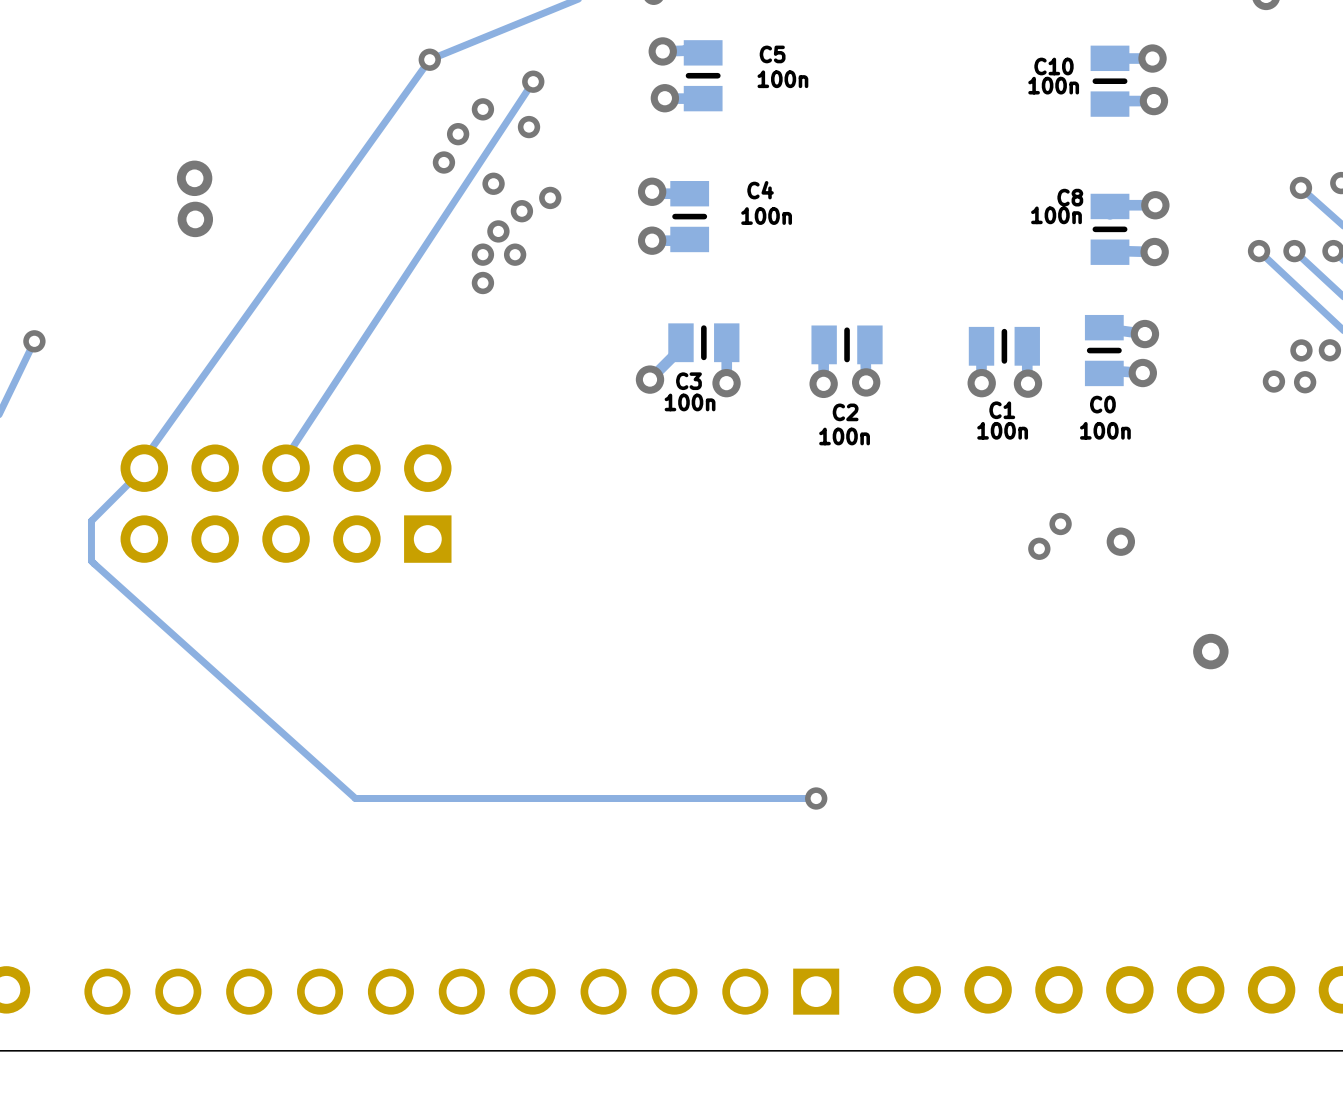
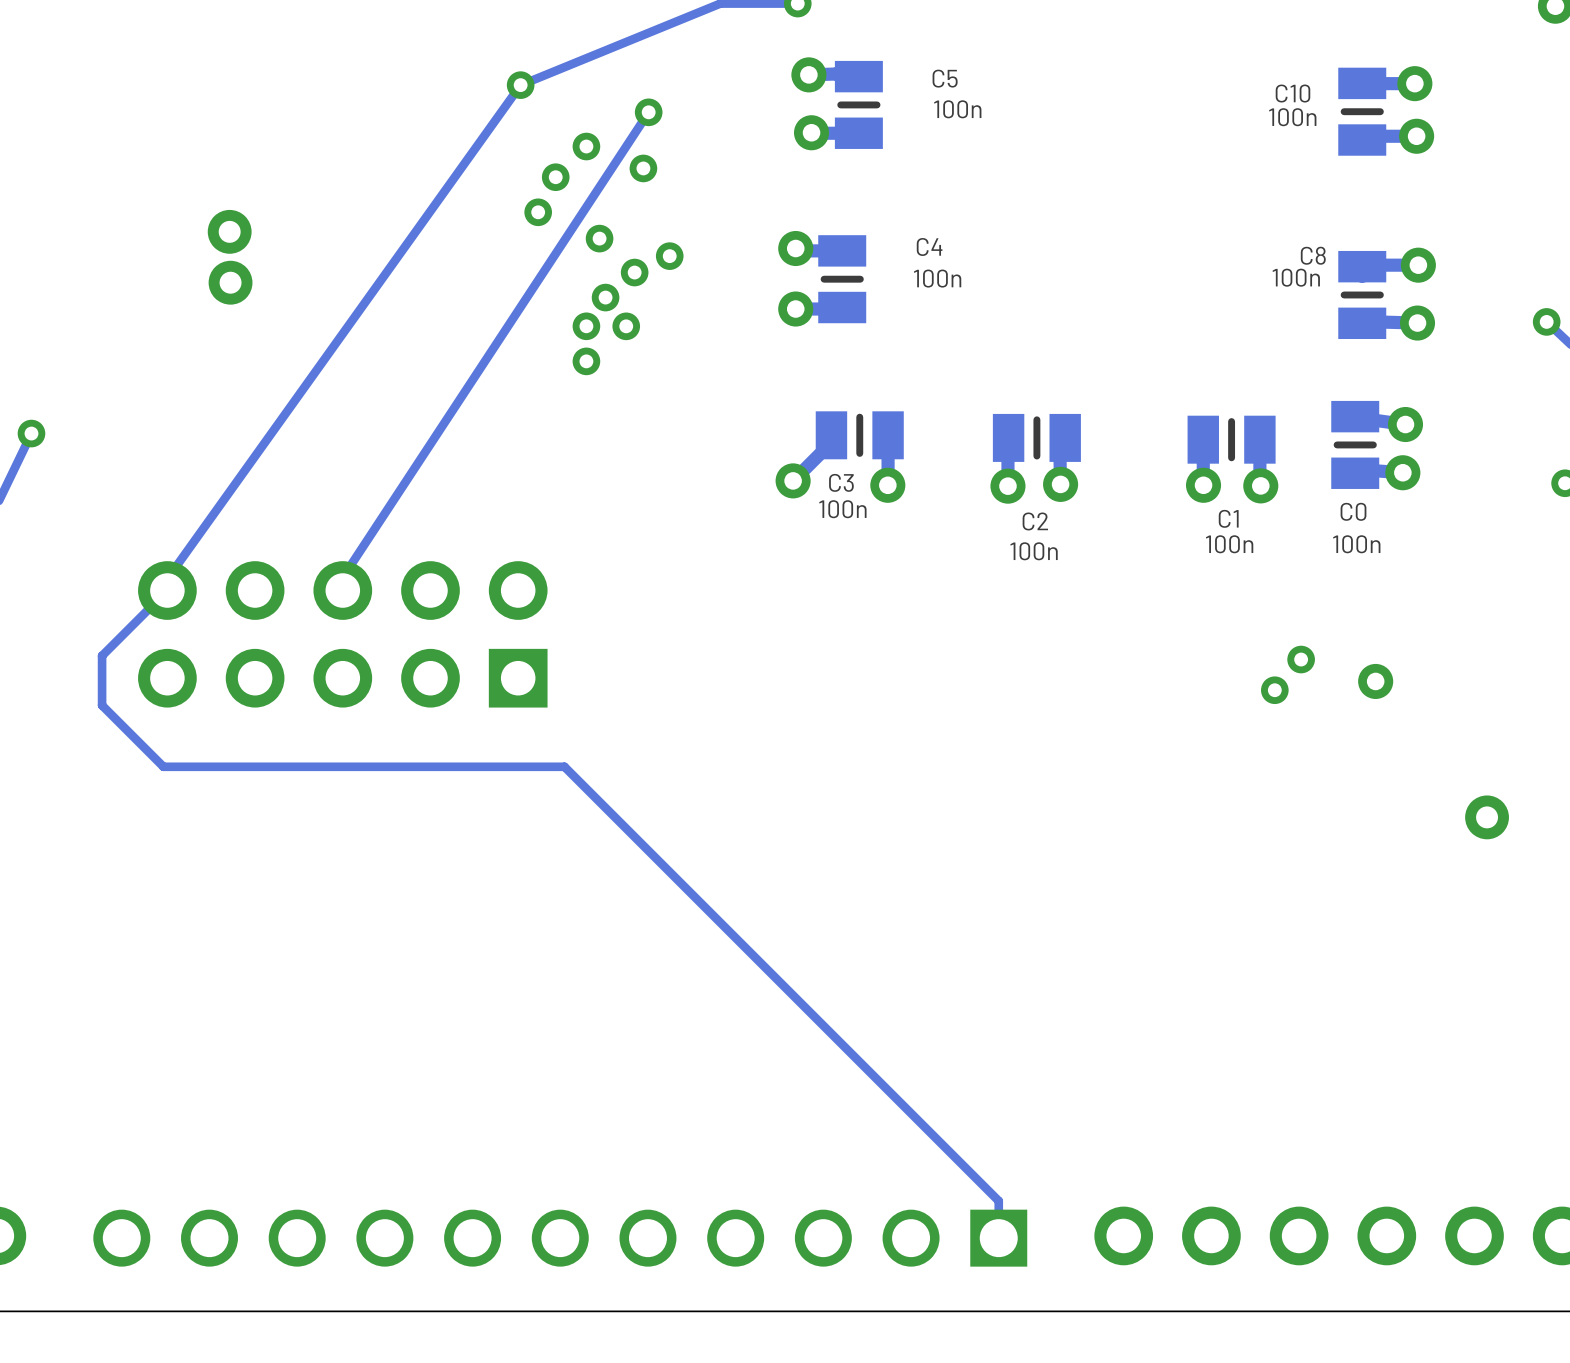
track: (94, 563) (355, 798) (816, 798) -> (105, 708) (163, 766) (564, 766) (998, 1201) (998, 1238)
via: (816, 798) -> none

